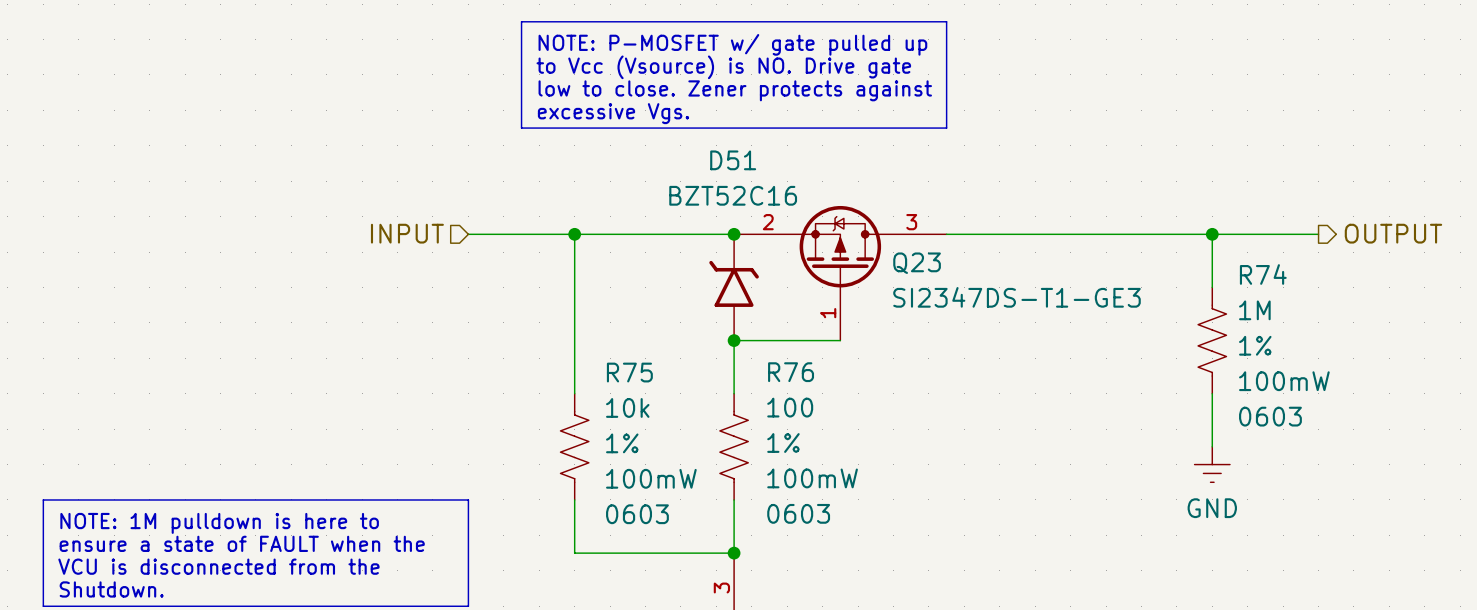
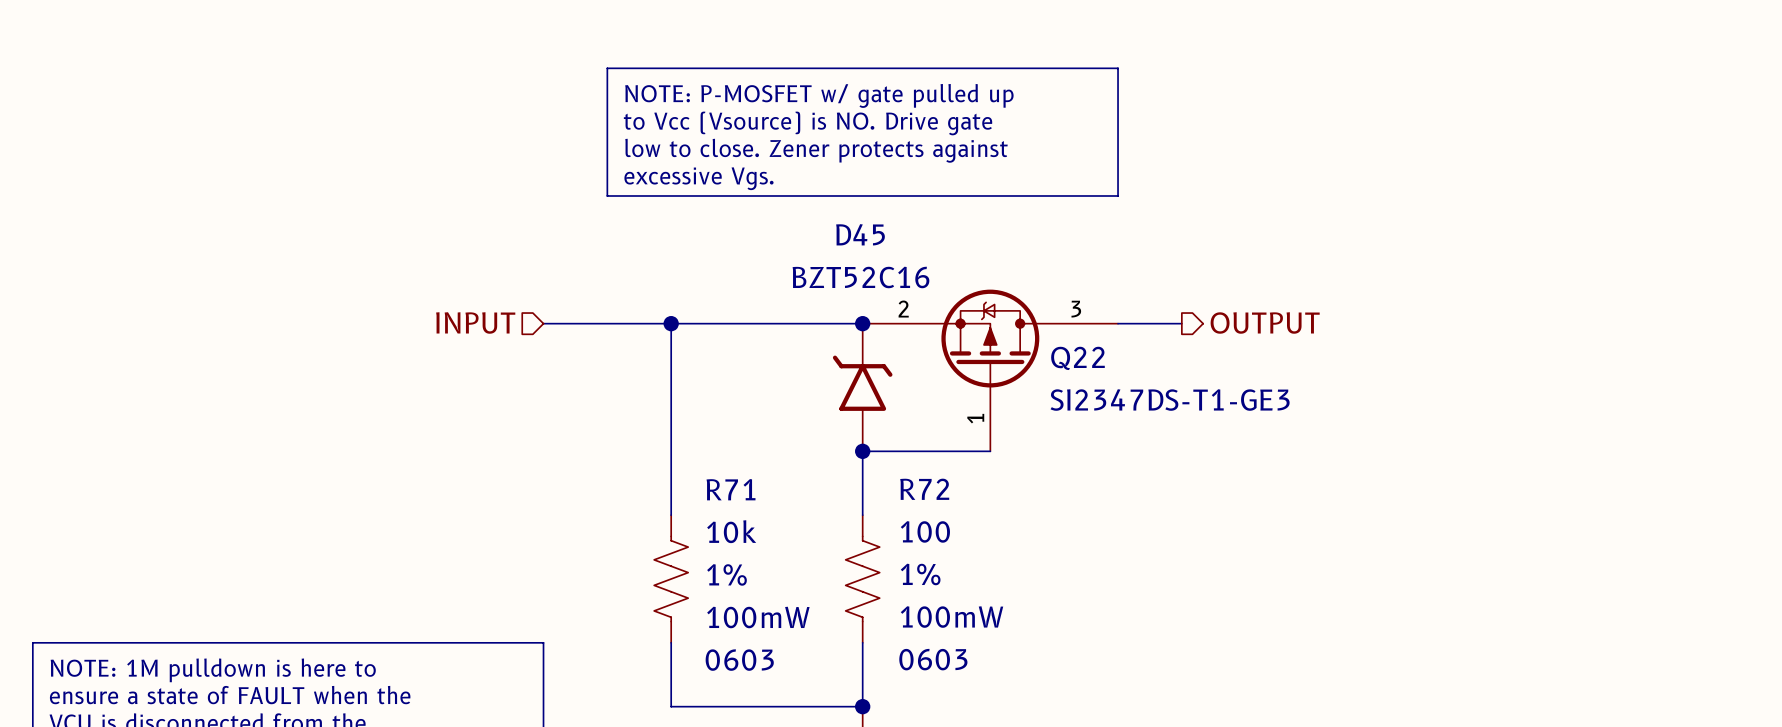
D51 name: D51 (733, 160) -> D45 (860, 234)
hierarchical label position: OUTPUT (1393, 233) -> OUTPUT (1265, 322)
wire: (999, 234) (1318, 234) -> none
wire: (1212, 234) (1212, 287) -> none
junction: (1212, 234) -> none
Q23 name: Q23 (917, 263) -> Q22 (1077, 358)
R74: 1M (1212, 340) -> none
R75 name: R75 (629, 372) -> R71 (731, 489)
R76 name: R76 (791, 372) -> R72 (924, 489)
wire: (1212, 393) (1212, 446) -> none
power symbol: GND (1212, 464) -> none

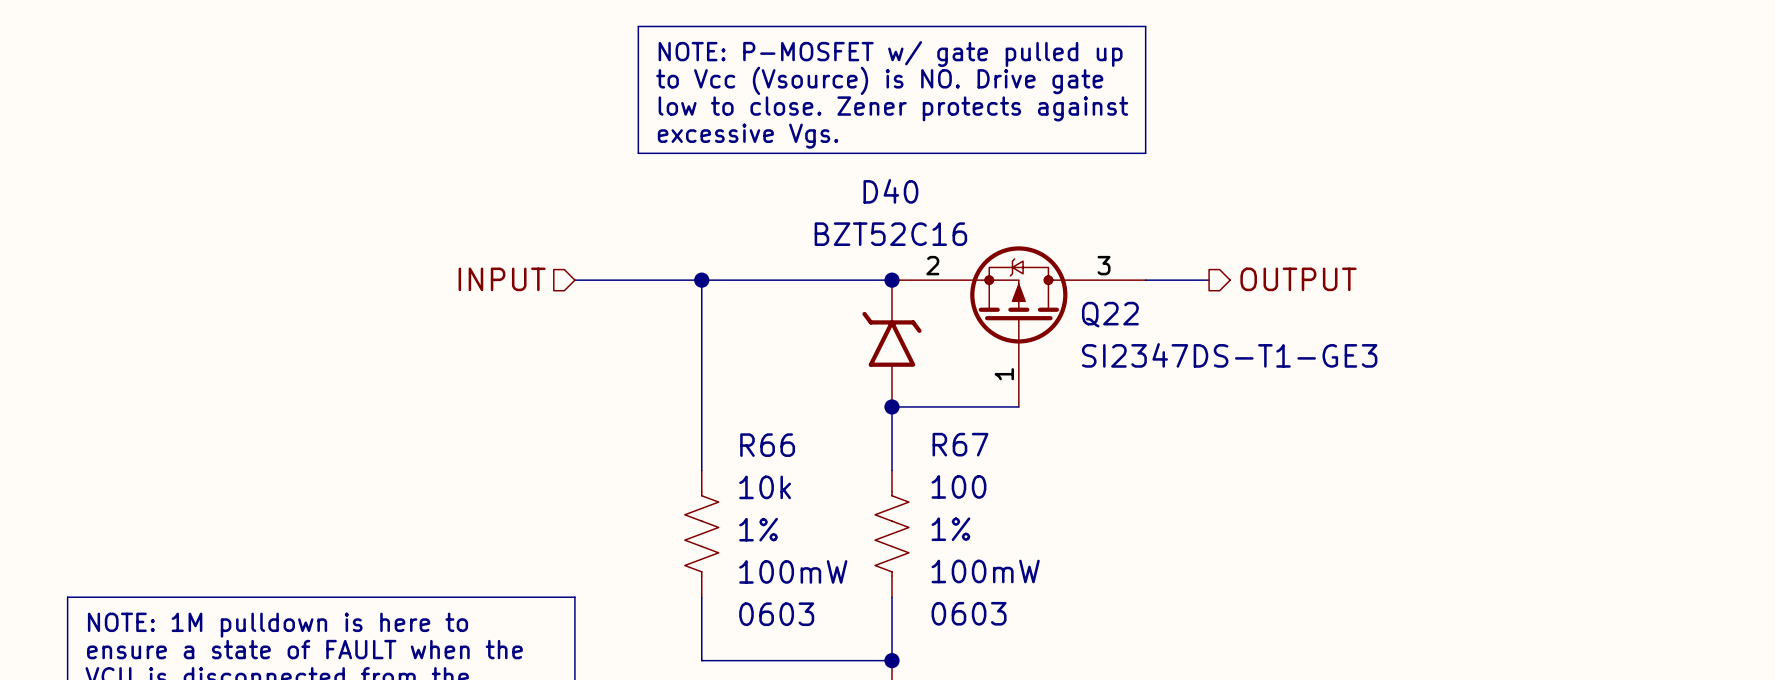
D45 name: D45 (860, 234) -> D40 (890, 191)
R71 name: R71 (731, 489) -> R66 (767, 445)
R72 name: R72 (924, 489) -> R67 (960, 444)

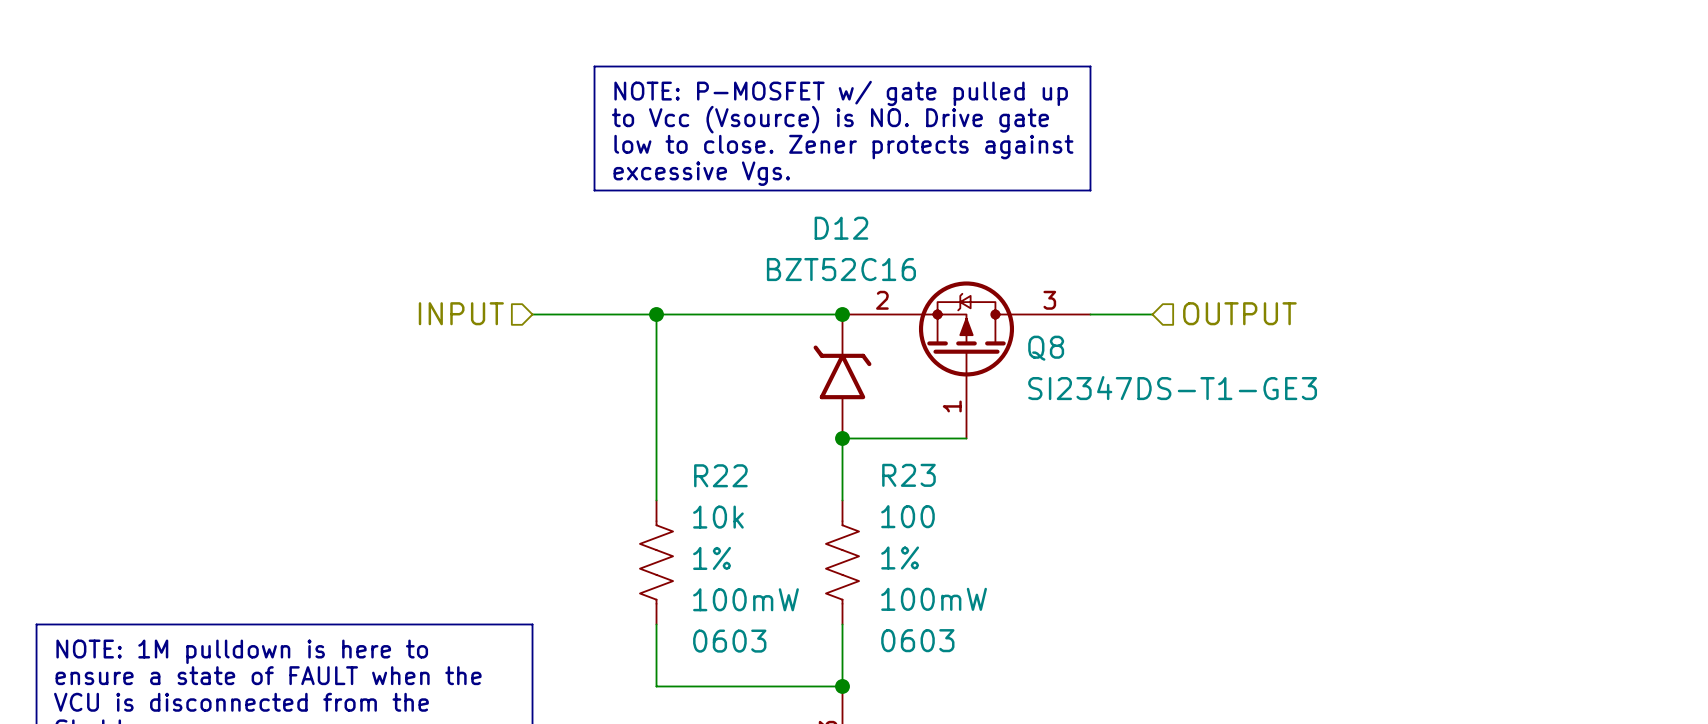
D40 name: D40 (890, 191) -> D12 (841, 228)
hierarchical label shape: output (1298, 279) -> input (1239, 313)
Q22 name: Q22 (1110, 314) -> Q8 (1046, 348)
R67 name: R67 (960, 444) -> R23 (908, 475)
R66 name: R66 (767, 445) -> R22 (720, 475)

